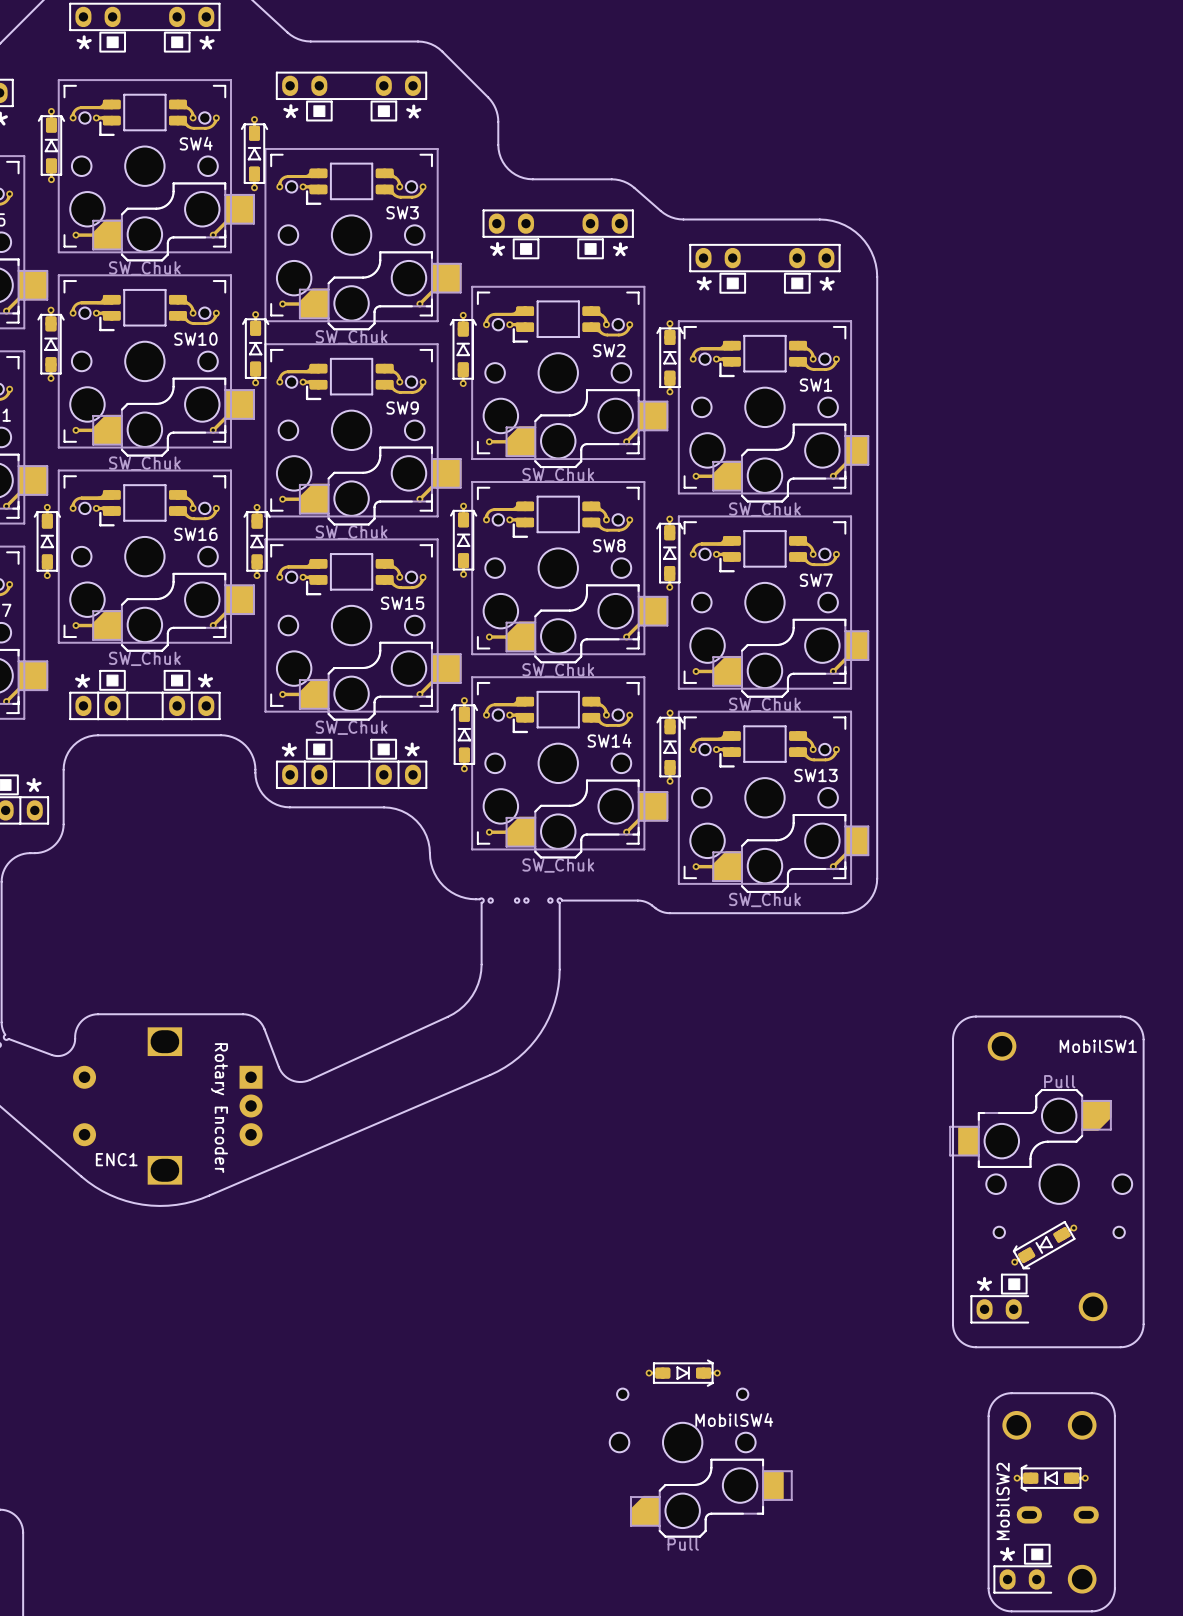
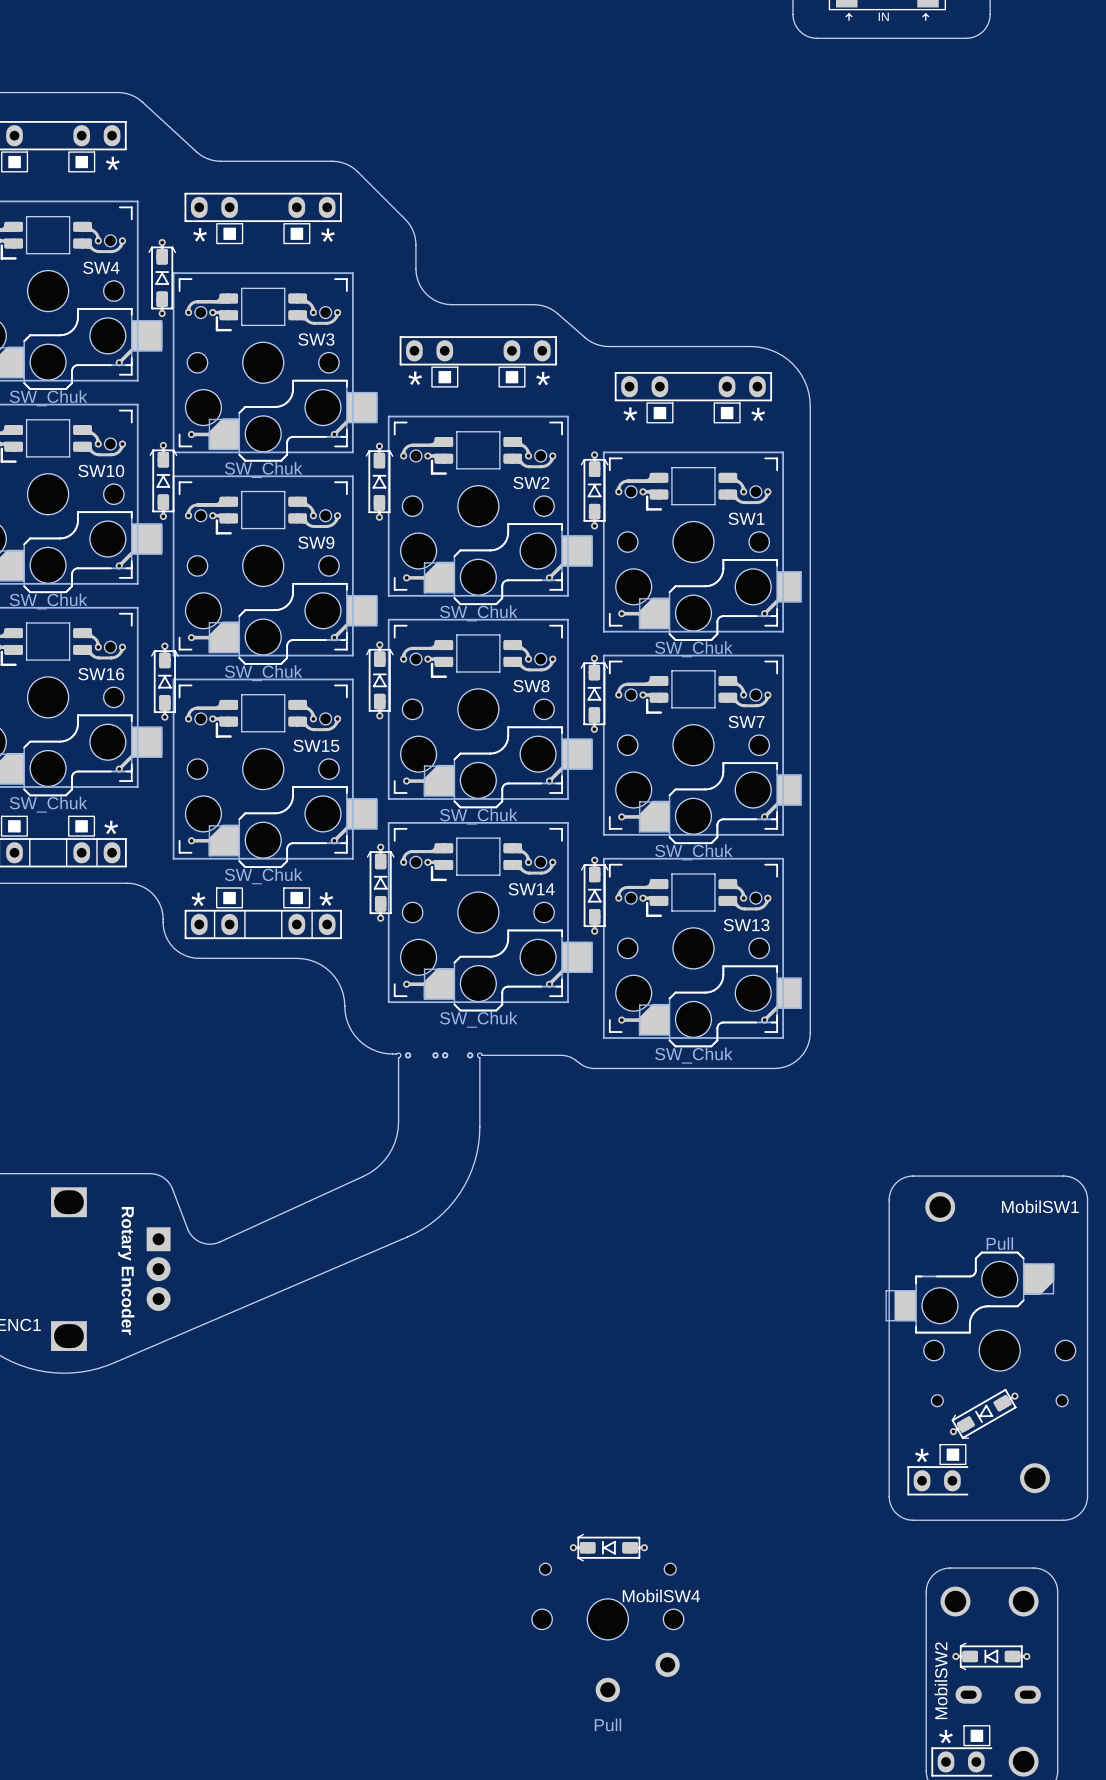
part rotation: 0° (683, 1373) -> 180° (608, 1547)
MobilSW4 footprint: [609, 1388, 793, 1538] -> [531, 1563, 684, 1703]

